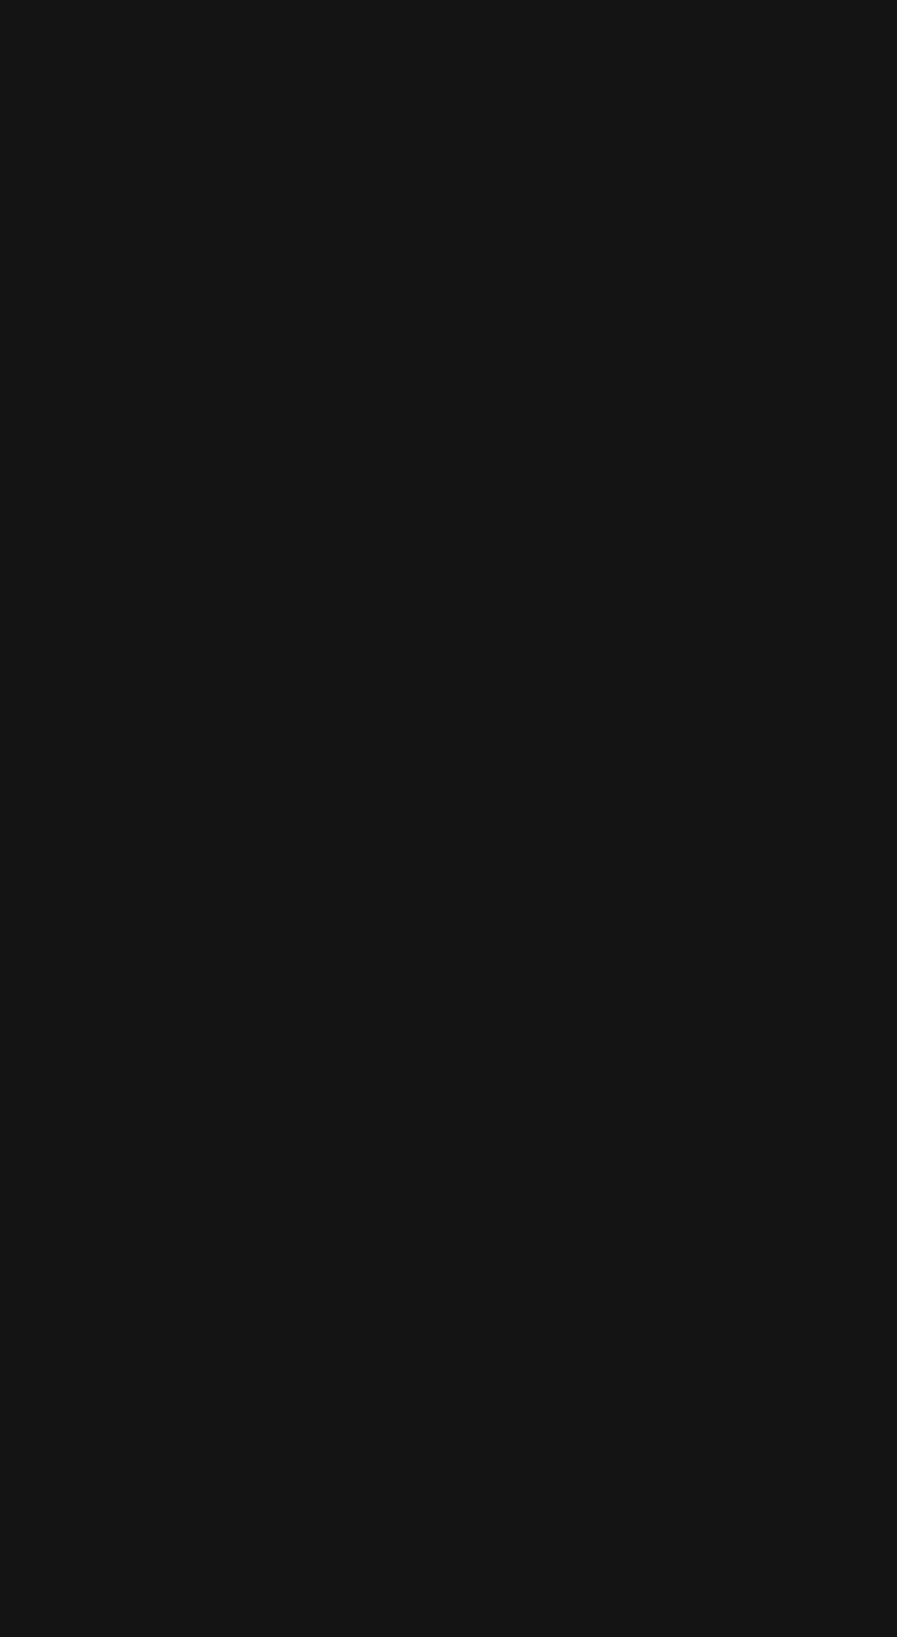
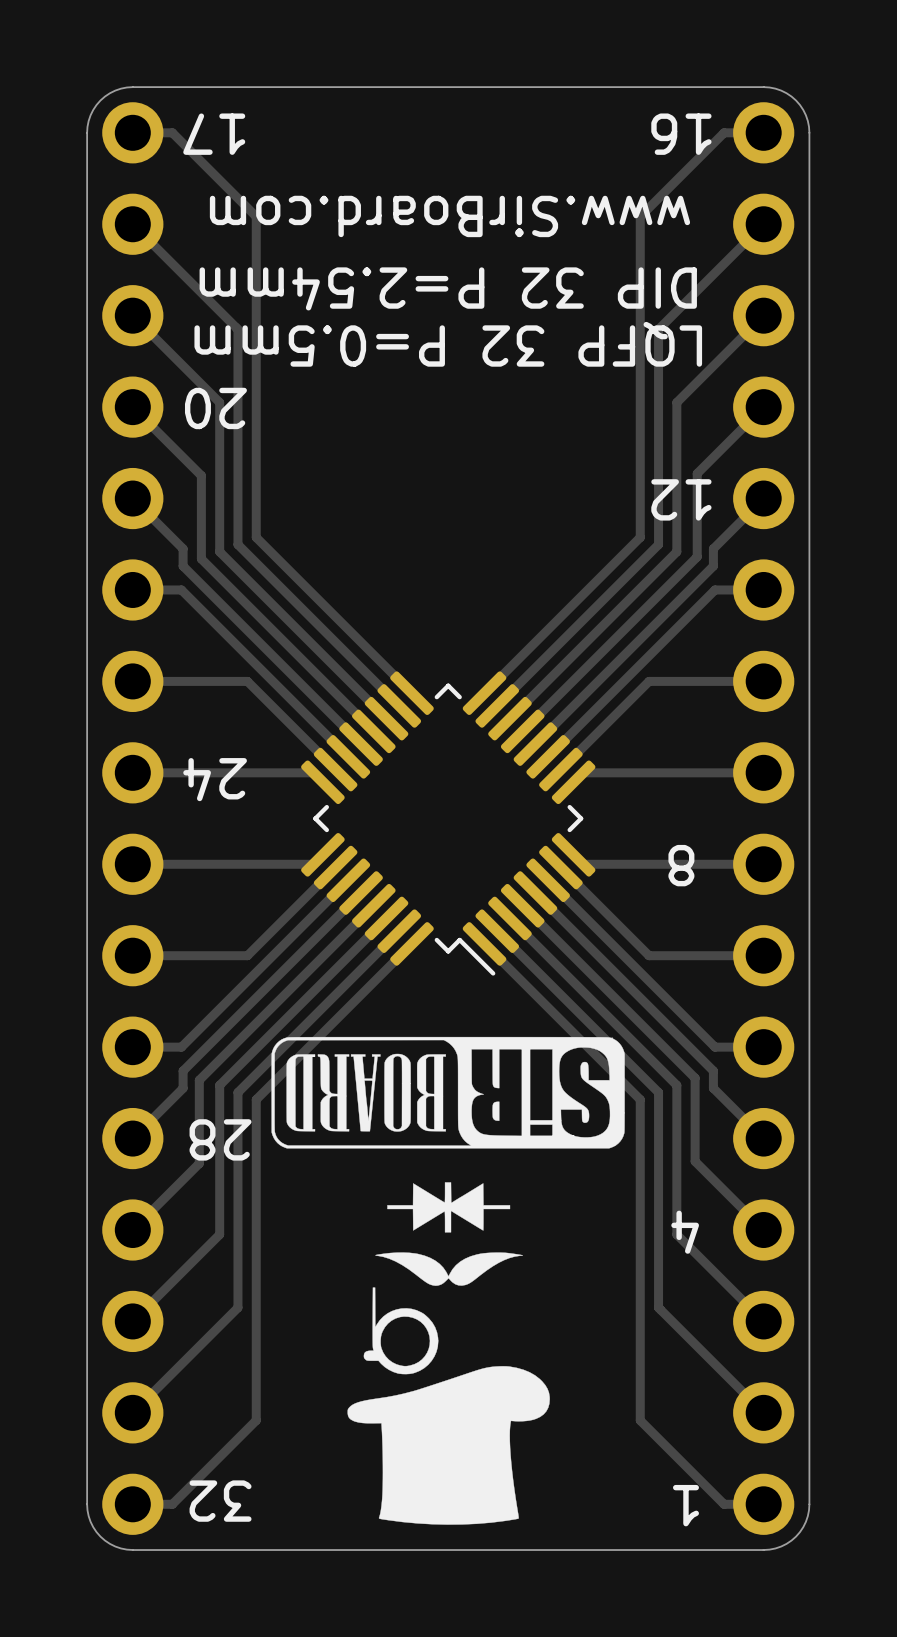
board edge: none -> (763, 87) (132, 87) (120, 88) (109, 93) (100, 100) (90, 115) (87, 132) (87, 1504) (88, 1516) (93, 1527) (104, 1540) (115, 1546) (132, 1550) (763, 1550) (781, 1546) (791, 1540) (799, 1532) (805, 1521) (809, 1504) (809, 132) (805, 115) (796, 100) (781, 90) (763, 87)
track: none -> (132, 132) (172, 132) (256, 216) (256, 537) (411, 693)
track: none -> (763, 132) (724, 132) (640, 216) (640, 537) (484, 693)
text: none -> 17 (214, 134)
text: none -> 16 (681, 134)
text: none -> www.SirBoard.com (449, 216)
track: none -> (132, 224) (237, 329) (237, 544) (399, 705)
track: none -> (763, 224) (658, 329) (658, 544) (497, 705)
text: none -> DIP 32 P=2.54mm (448, 288)
track: none -> (132, 315) (219, 402) (219, 551) (386, 718)
track: none -> (763, 315) (676, 402) (676, 551) (509, 718)
text: none -> LQFP 32 P=0.5mm (448, 344)
track: none -> (132, 407) (201, 475) (201, 558) (373, 731)
track: none -> (763, 407) (697, 473) (697, 556) (522, 731)
text: none -> 20 (215, 408)
track: none -> (132, 498) (183, 548) (183, 566) (361, 744)
track: none -> (763, 498) (713, 548) (713, 566) (535, 744)
text: none -> 12 (681, 499)
track: none -> (132, 589) (181, 589) (348, 756)
track: none -> (763, 589) (715, 589) (548, 756)
track: none -> (132, 681) (247, 681) (335, 769)
track: none -> (763, 681) (649, 681) (560, 769)
track: none -> (132, 772) (313, 772) (322, 782)
track: none -> (763, 772) (583, 772) (573, 782)
text: none -> 24 (215, 779)
part: none -> (132, 818)
part: none -> (763, 818)
part: none -> (448, 823)
track: none -> (322, 854) (313, 864) (132, 864)
track: none -> (573, 854) (583, 864) (763, 864)
text: none -> 8 (681, 865)
track: none -> (335, 867) (247, 955) (132, 955)
track: none -> (560, 867) (649, 955) (763, 955)
track: none -> (348, 880) (181, 1047) (132, 1047)
track: none -> (548, 880) (715, 1047) (763, 1047)
track: none -> (361, 893) (183, 1070) (183, 1088) (132, 1138)
track: none -> (535, 893) (713, 1070) (713, 1088) (763, 1138)
track: none -> (373, 905) (199, 1080) (199, 1163) (132, 1230)
track: none -> (522, 905) (695, 1078) (695, 1161) (763, 1230)
track: none -> (386, 918) (219, 1085) (219, 1234) (132, 1321)
track: none -> (509, 918) (676, 1085) (676, 1234) (763, 1321)
track: none -> (399, 931) (237, 1092) (237, 1307) (132, 1412)
track: none -> (497, 931) (658, 1092) (658, 1307) (763, 1412)
track: none -> (411, 943) (256, 1099) (256, 1420) (172, 1504) (132, 1504)
track: none -> (484, 943) (640, 1099) (640, 1420) (724, 1504) (763, 1504)
drawing: none -> [271, 1036, 625, 1525]
text: none -> 28 (220, 1139)
text: none -> 4 (685, 1232)
text: none -> 32 (220, 1501)
text: none -> 1 (685, 1505)

